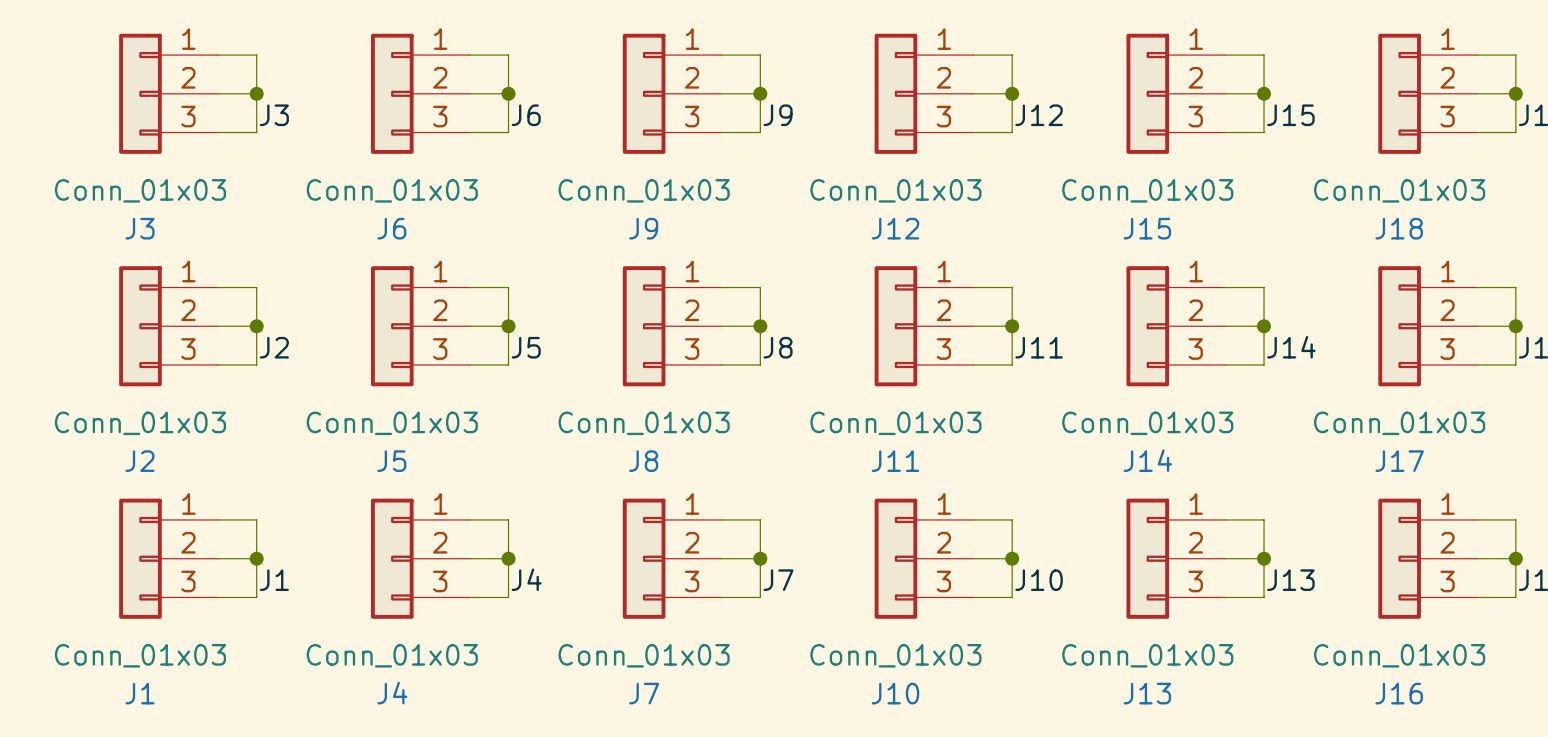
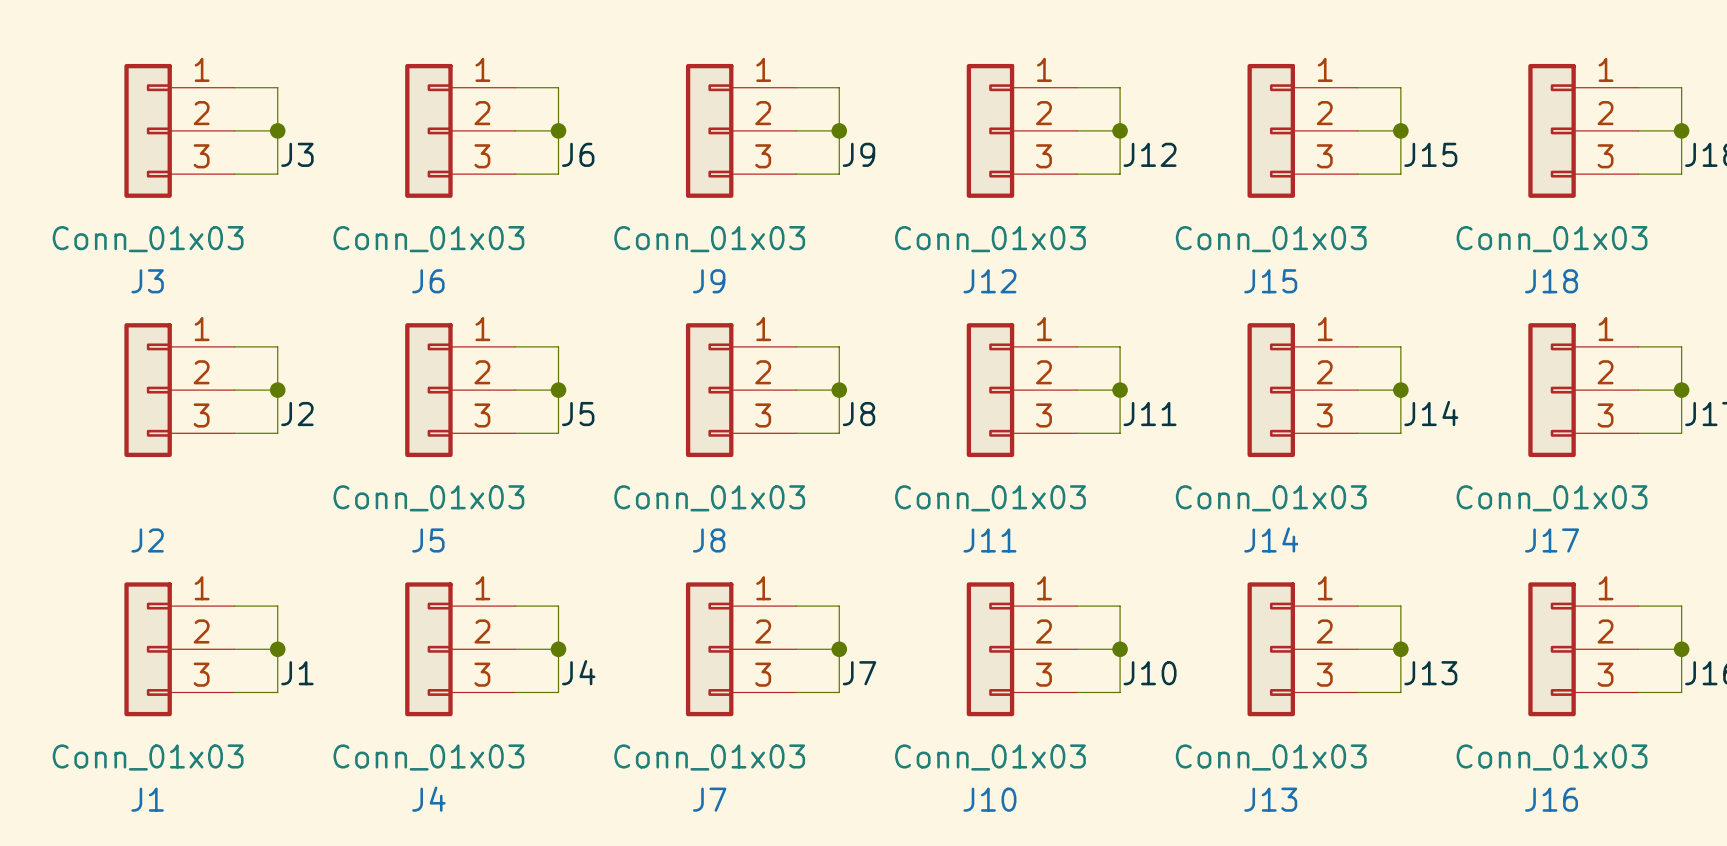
J2 value: Conn_01x03 (140, 423) -> none

